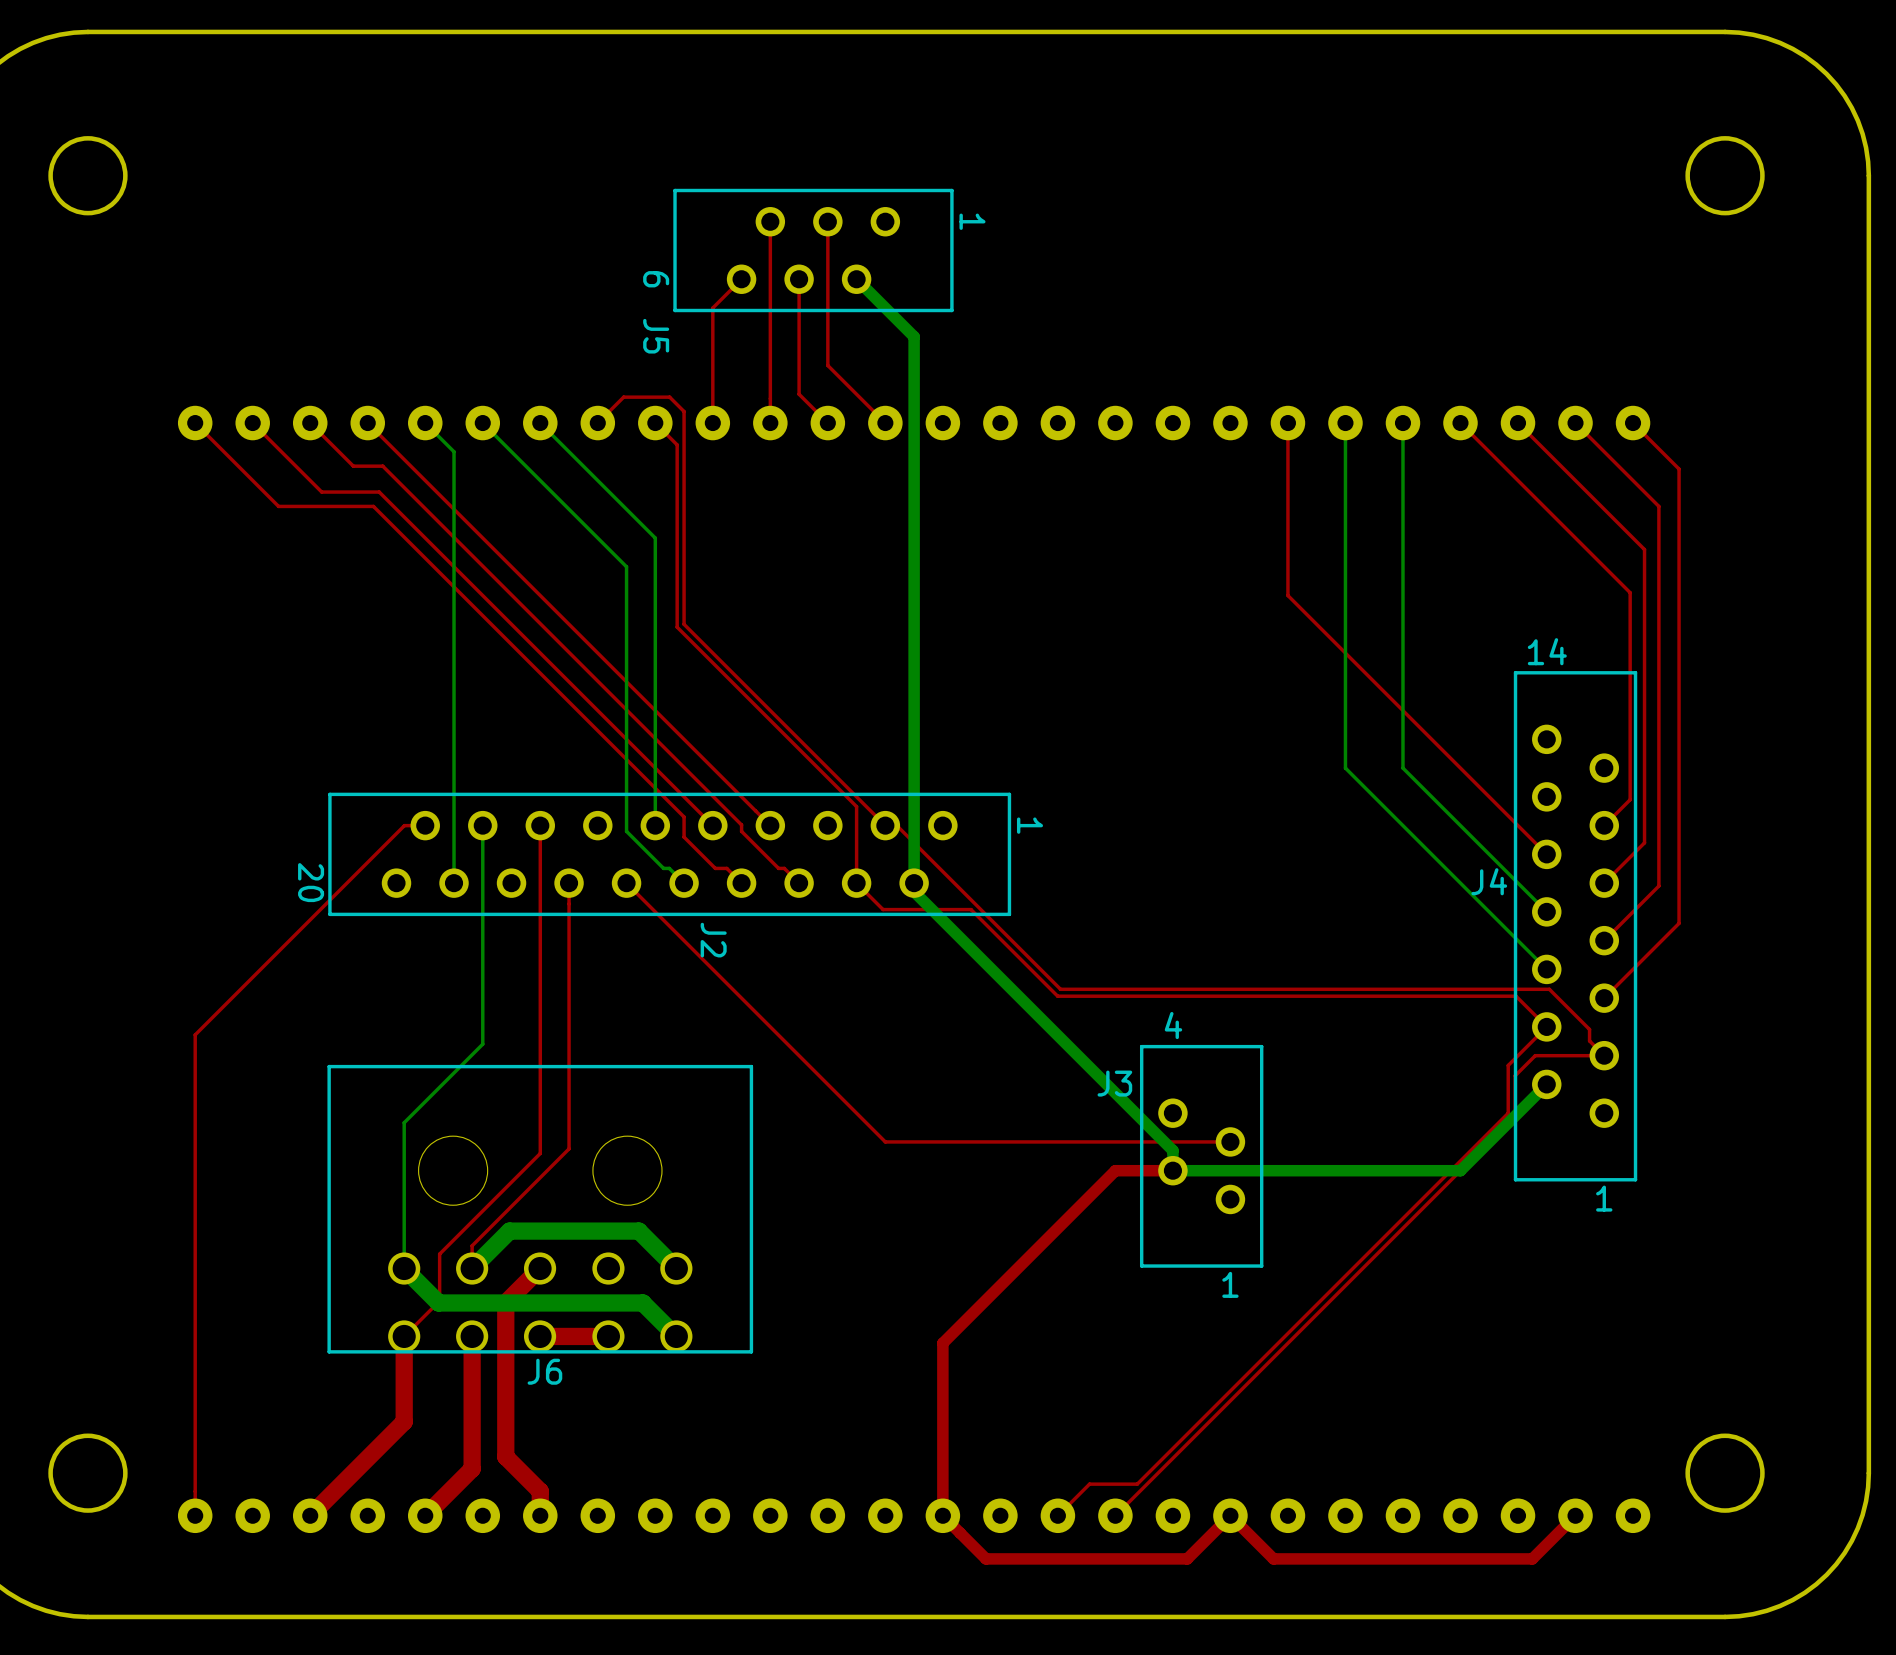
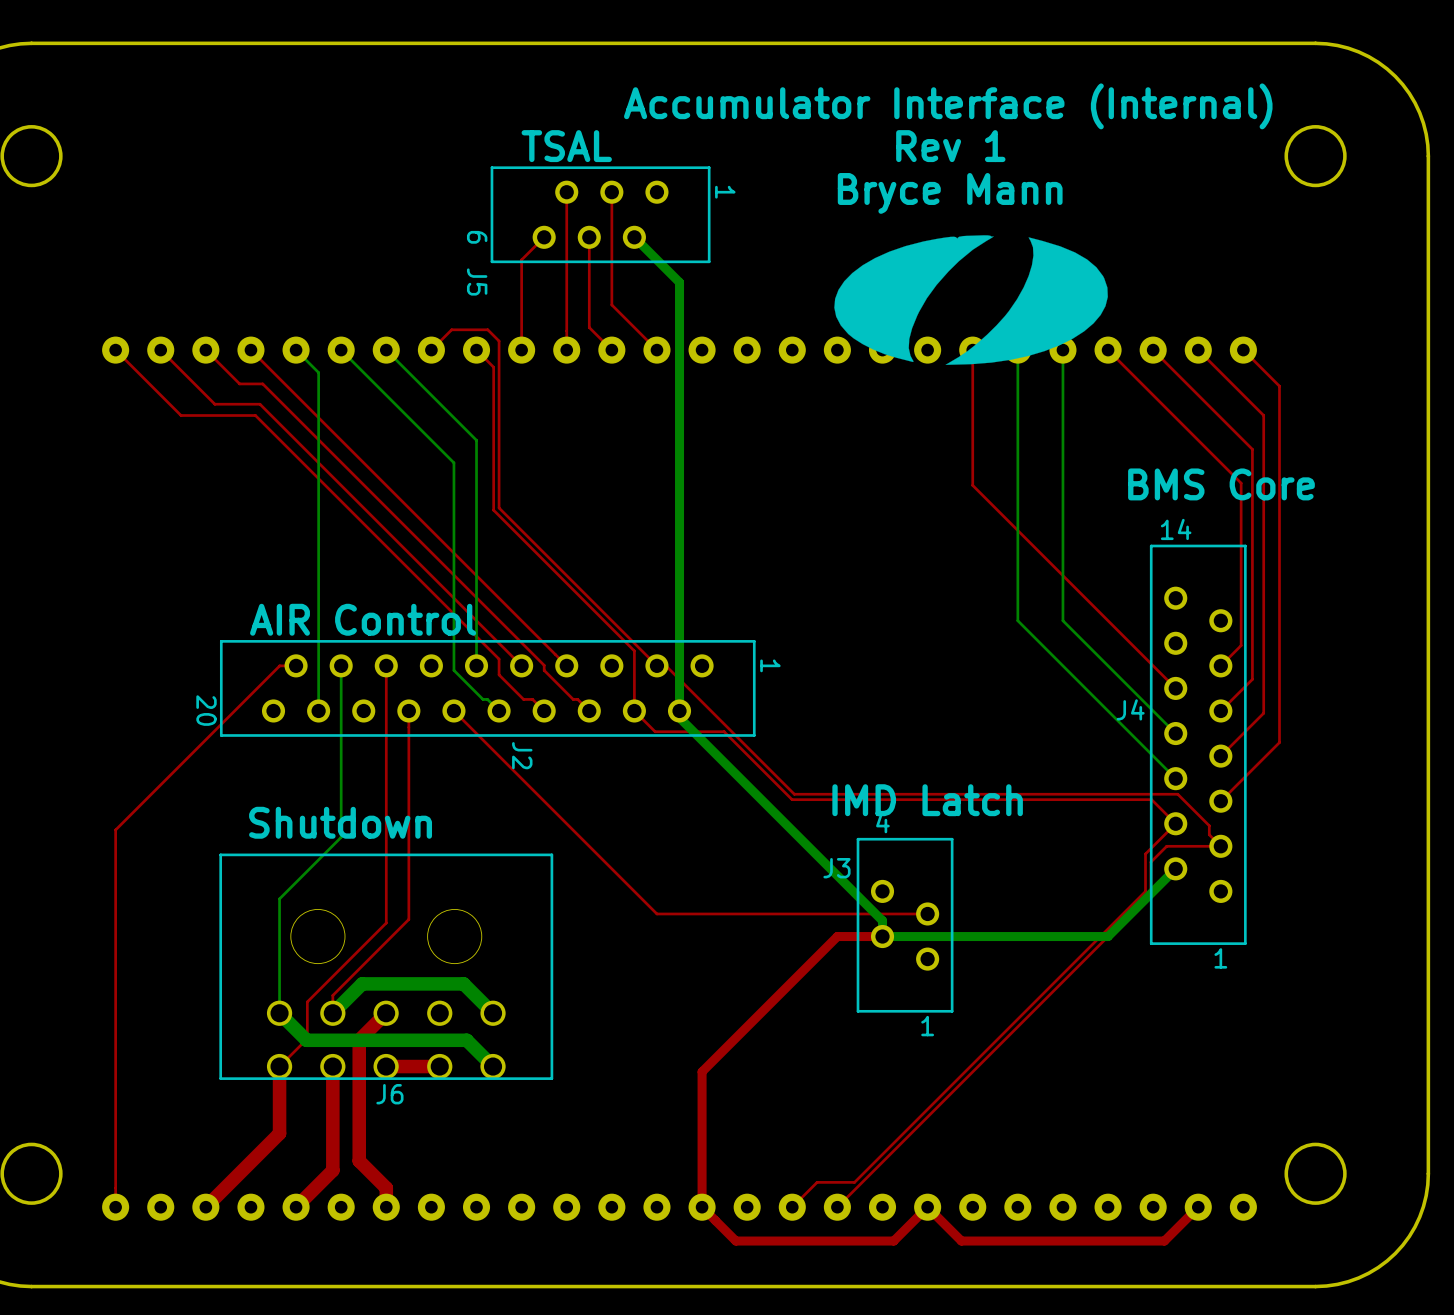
text: none -> Accumulator Interface (Internal) (948, 106)
text: none -> TSAL (566, 146)
text: none -> Rev 1 (950, 146)
text: none -> Bryce Mann (950, 193)
drawing: none -> [834, 235, 1108, 365]
text: none -> BMS Core (1221, 484)
text: none -> AIR Control (363, 619)
text: none -> IMD Latch (927, 800)
text: none -> Shutdown (340, 822)

